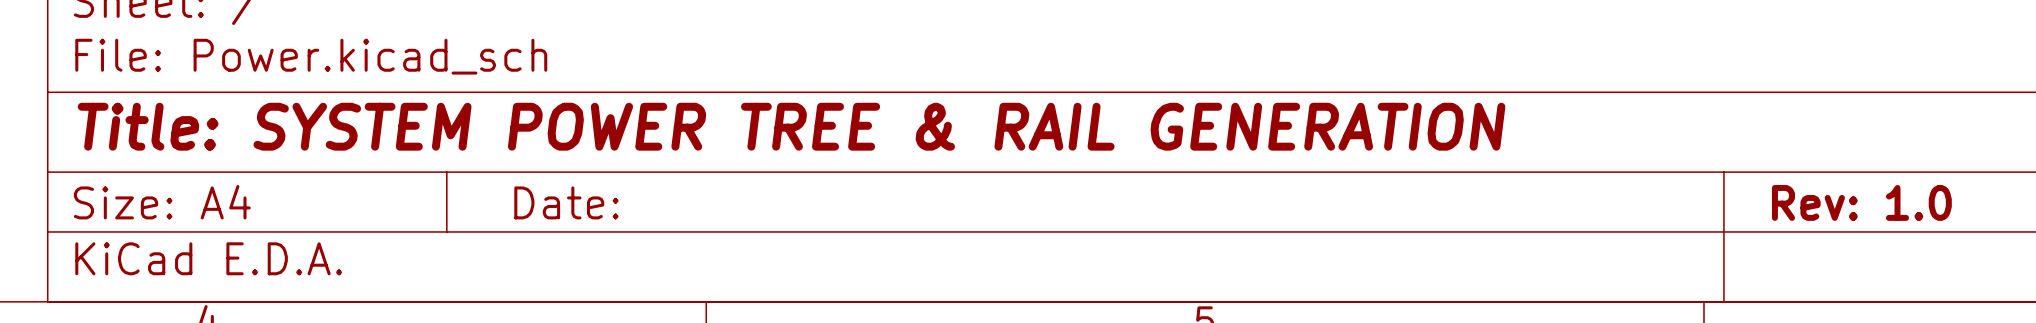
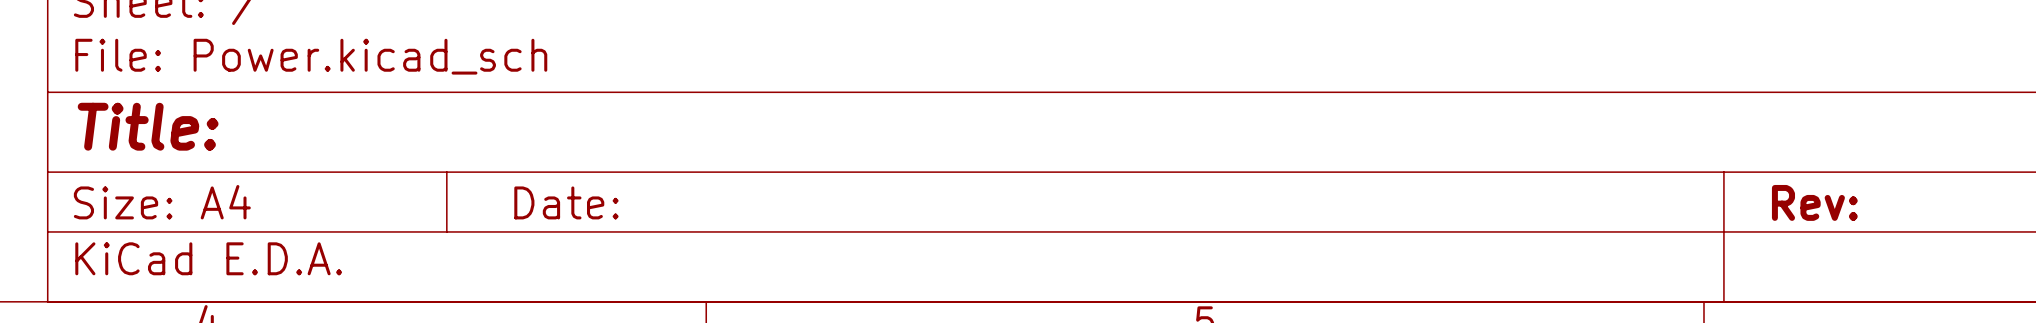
title block: Title: SYSTEM POWER TREE & RAIL GENERATION (791, 126) -> Title: (148, 126)
title block: Rev: 1.0 (1861, 202) -> Rev: (1814, 202)

